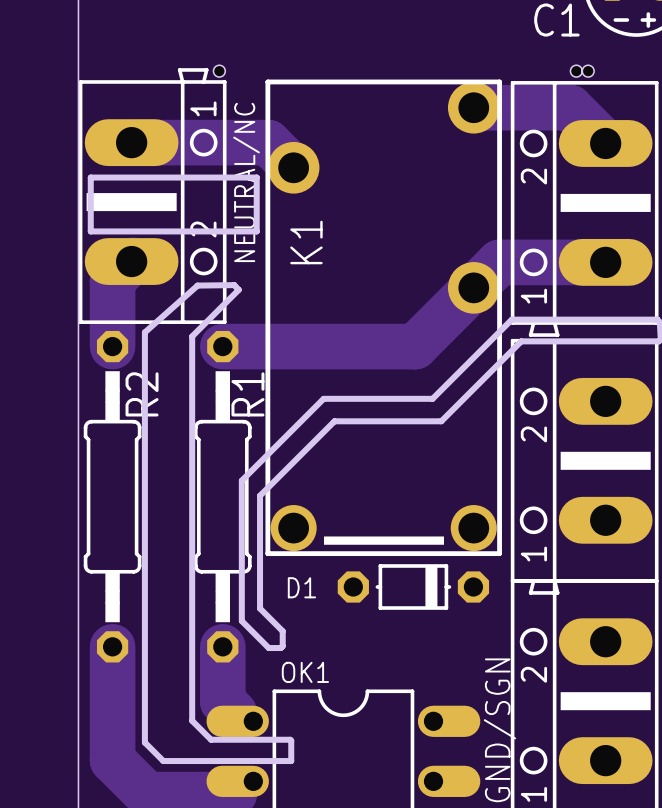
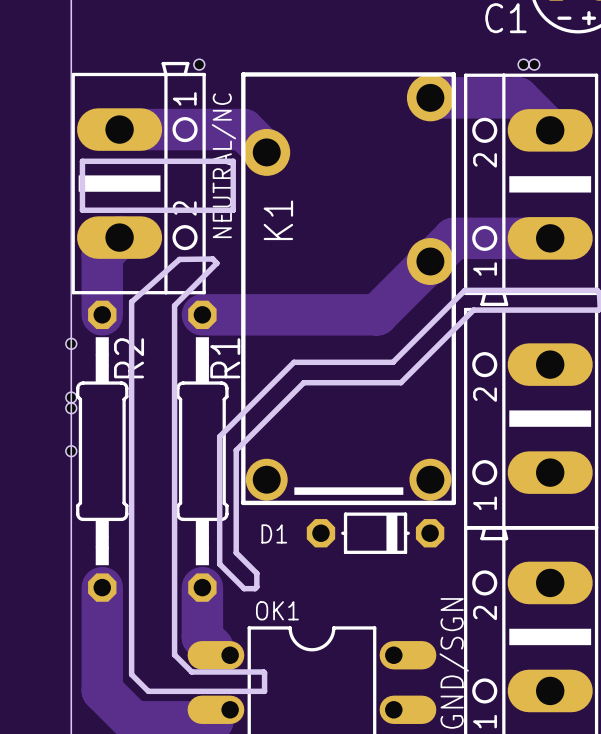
hole: none -> (71, 343)
hole: none -> (71, 397)
hole: none -> (71, 408)
hole: none -> (71, 451)

